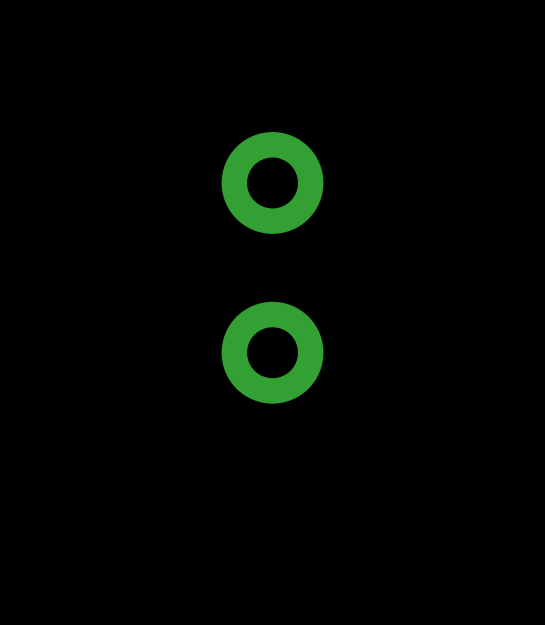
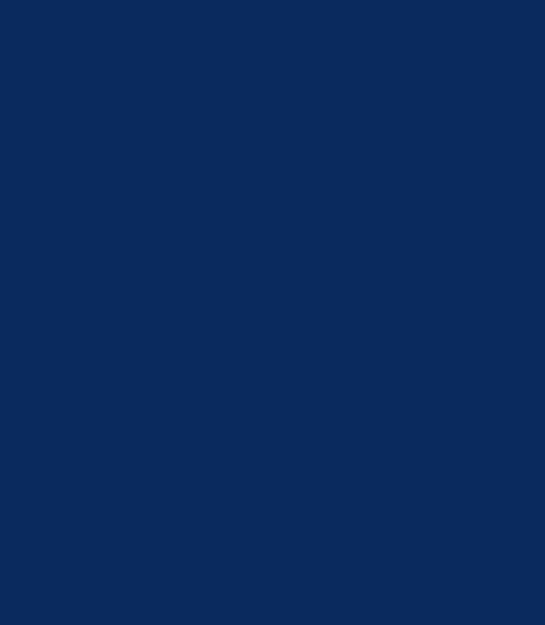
part: (272, 267) -> none

